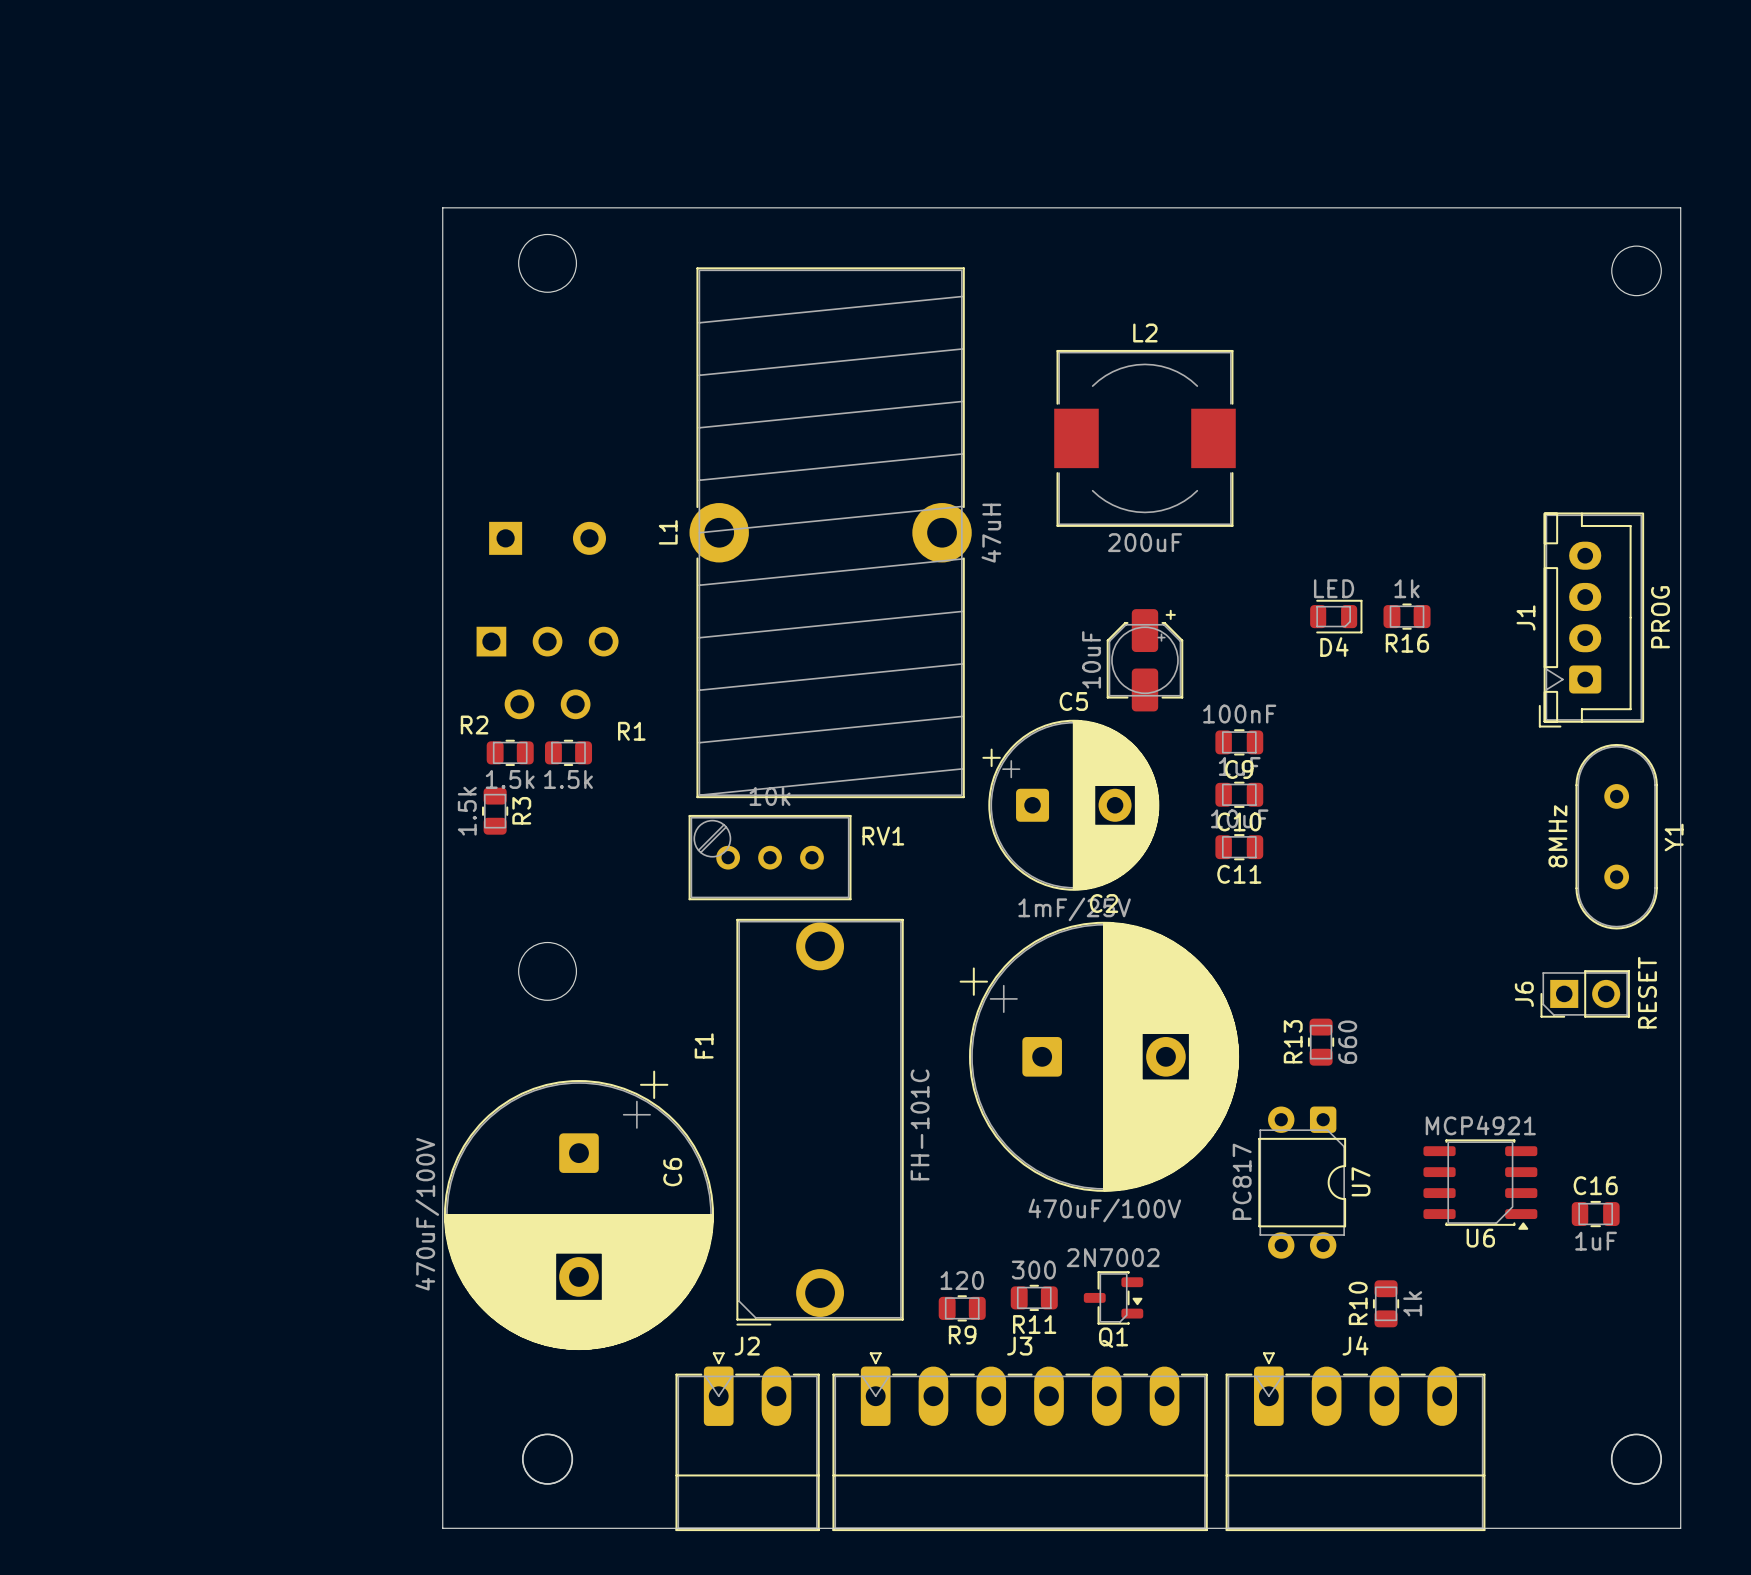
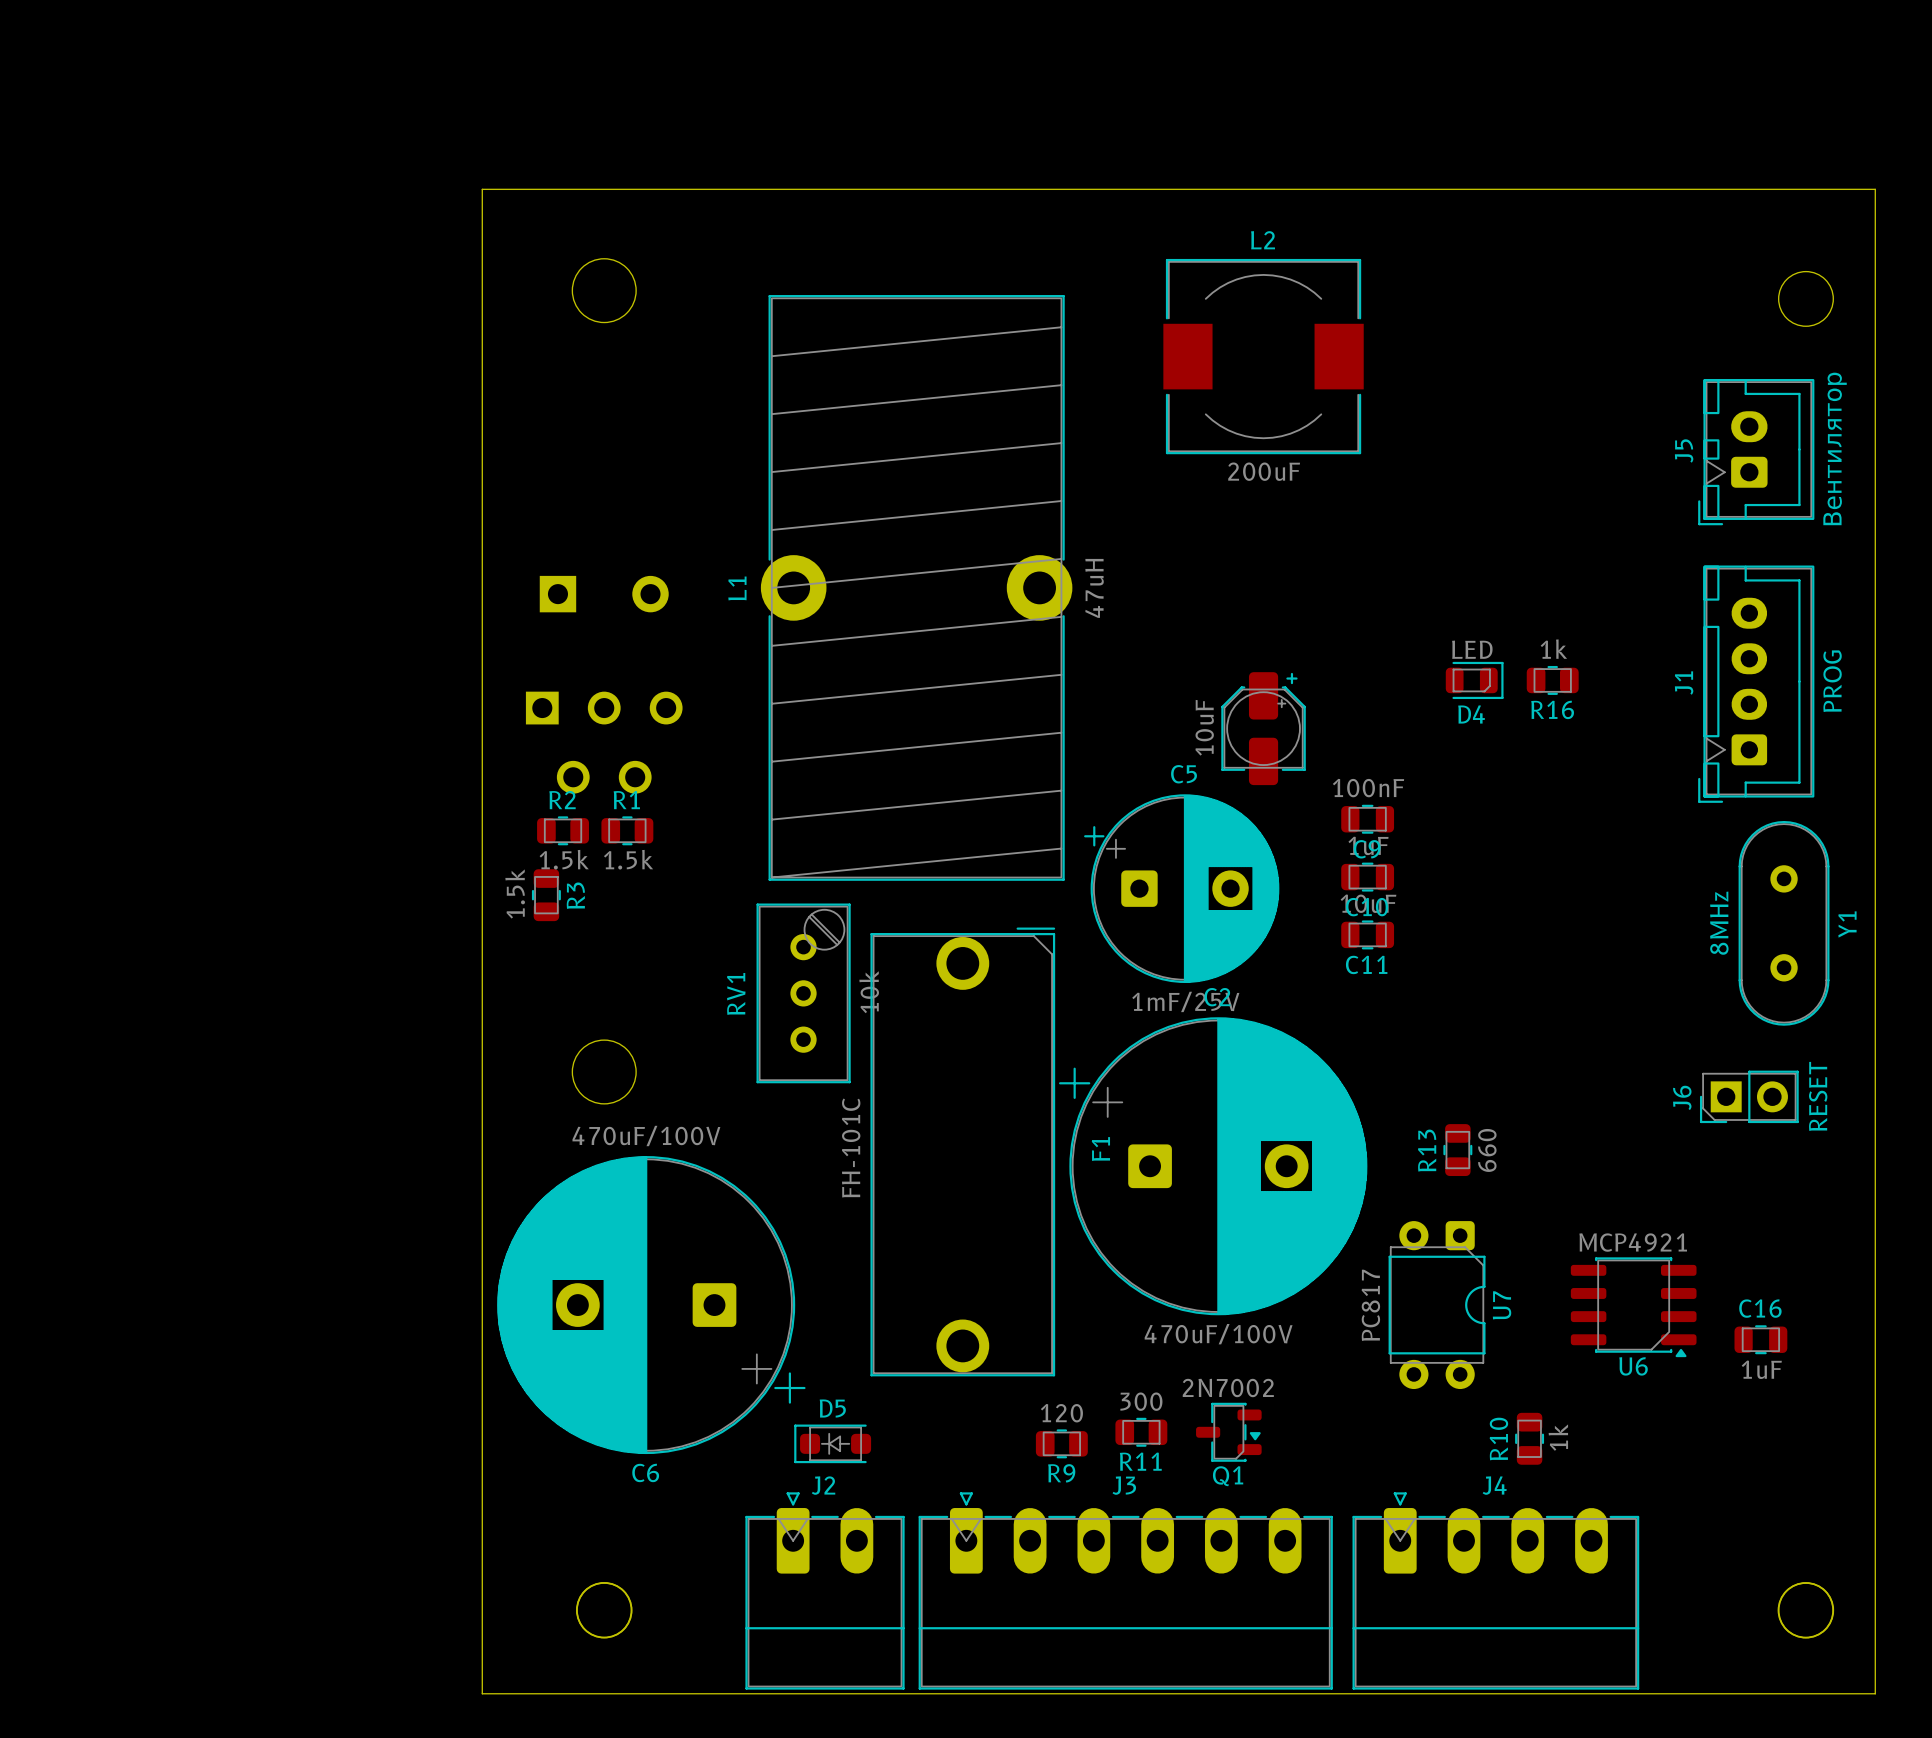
board edge: (442, 207) (1680, 207) (1680, 1528) (442, 1528) (442, 207) -> (482, 189) (482, 1693) (1875, 1693) (1875, 189) (482, 189)
J5: none -> Вентилятор (1756, 452)
L2 position: (1144, 438) -> (1263, 356)
R2 name position: R2 (474, 725) -> R2 (562, 800)
R1 name position: R1 (631, 731) -> R1 (626, 800)
RV1 name position: RV1 (883, 836) -> RV1 (736, 993)
RV1 rotation: 0° (770, 857) -> 90° clockwise (803, 993)
F1 name position: F1 (704, 1045) -> F1 (1100, 1149)
F1 rotation: 0° (820, 1122) -> 180° (962, 1151)
C6 name position: C6 (672, 1172) -> C6 (645, 1472)
C6 rotation: 0° (578, 1210) -> 90° clockwise (651, 1305)
D5: none -> (832, 1443)

